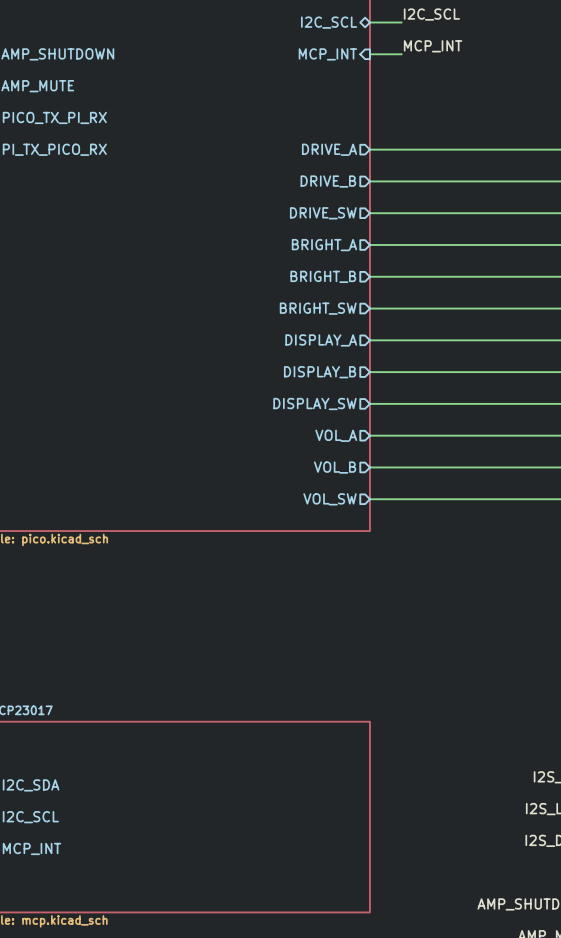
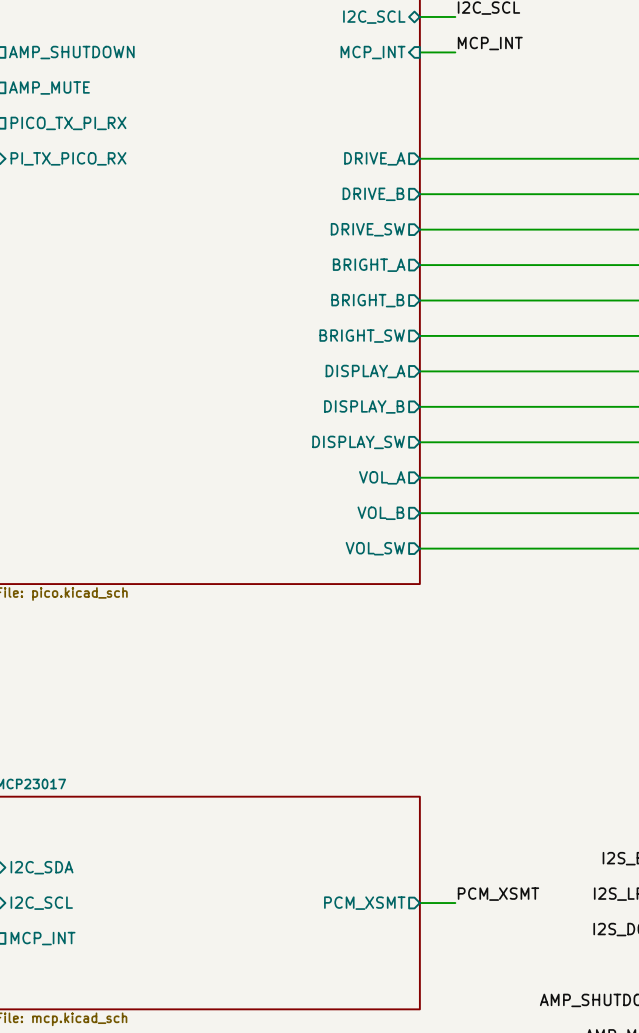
label: none -> PCM_XSMT (498, 894)
sheet pin: none -> PCM_XSMT (364, 903)
wire: none -> (419, 903) (455, 903)

